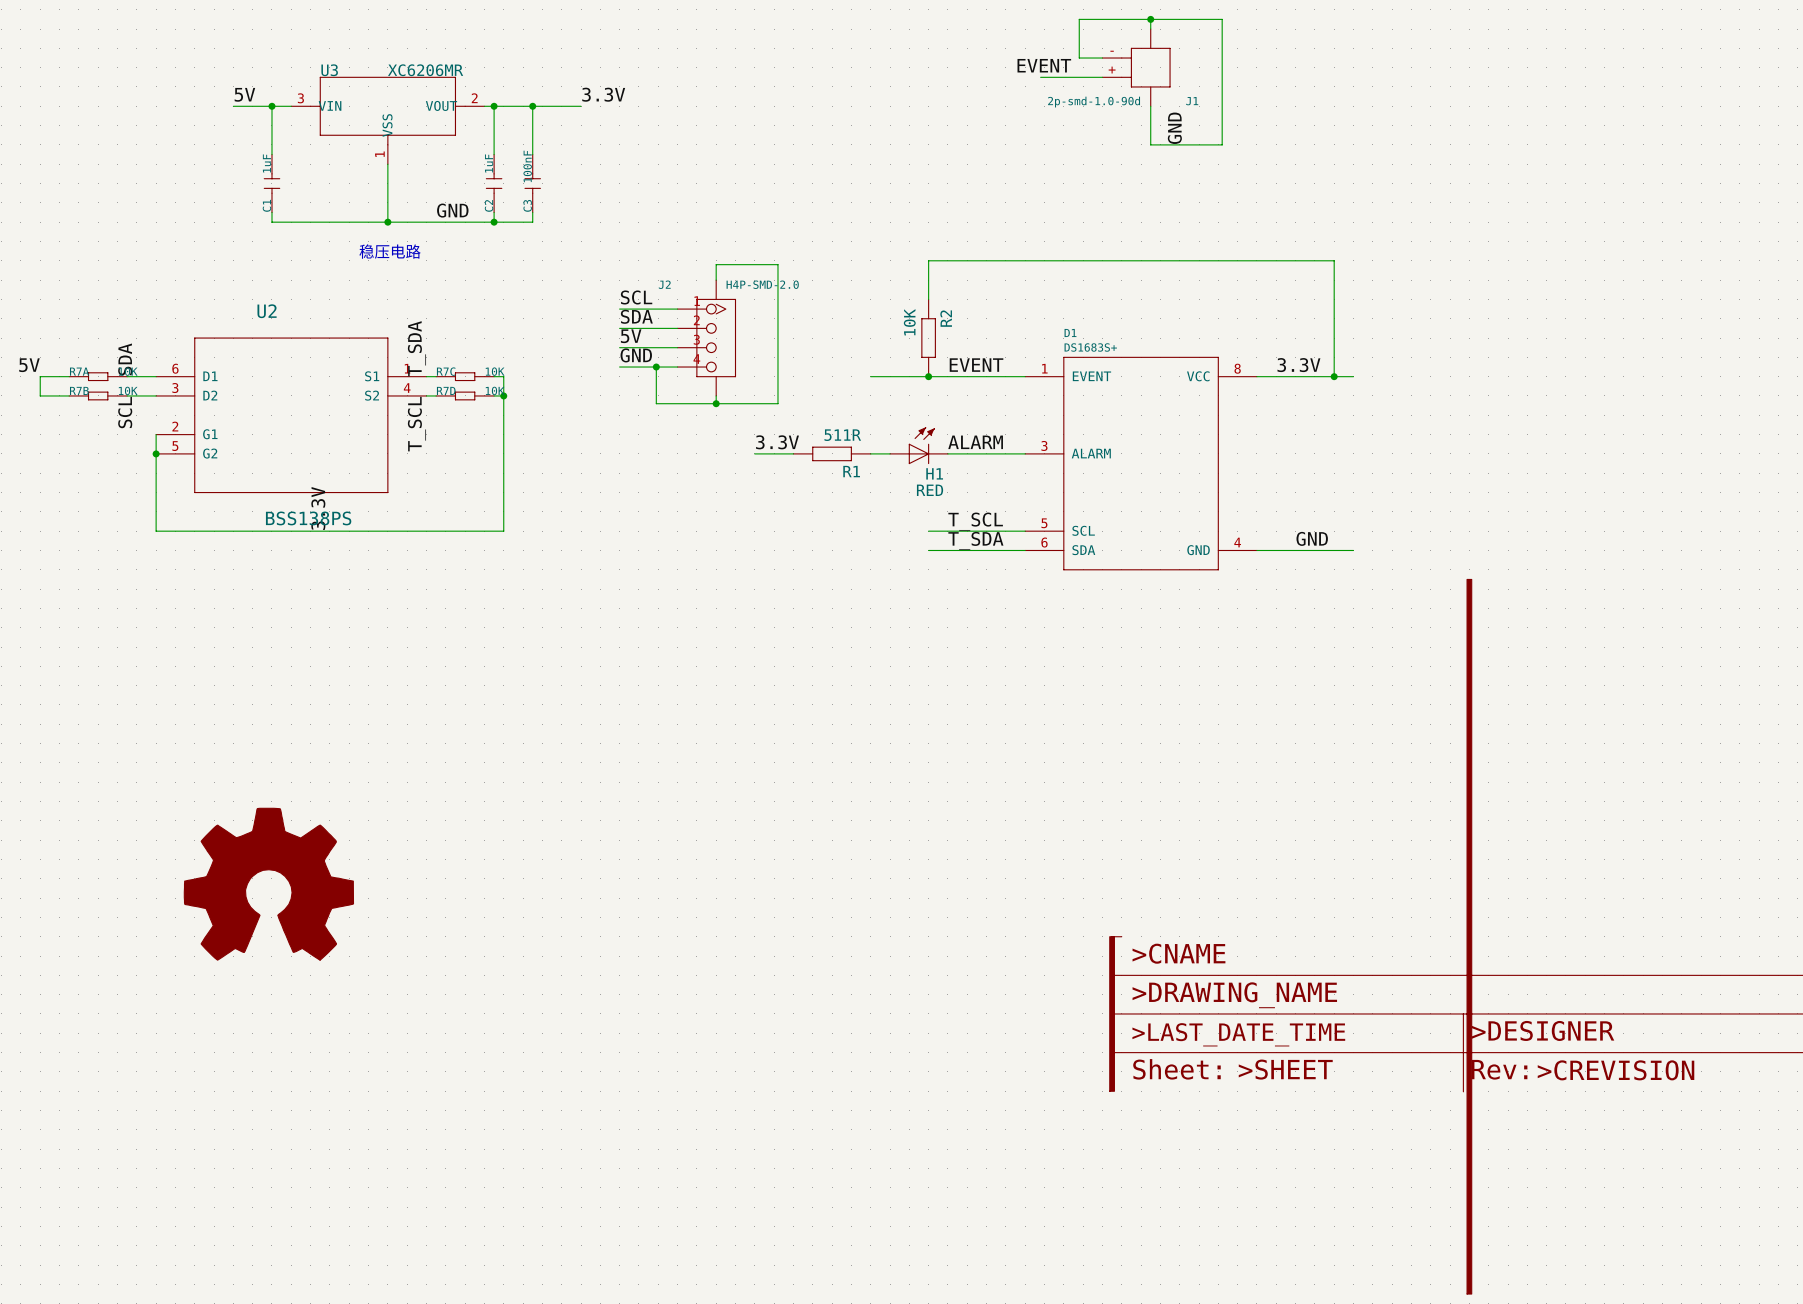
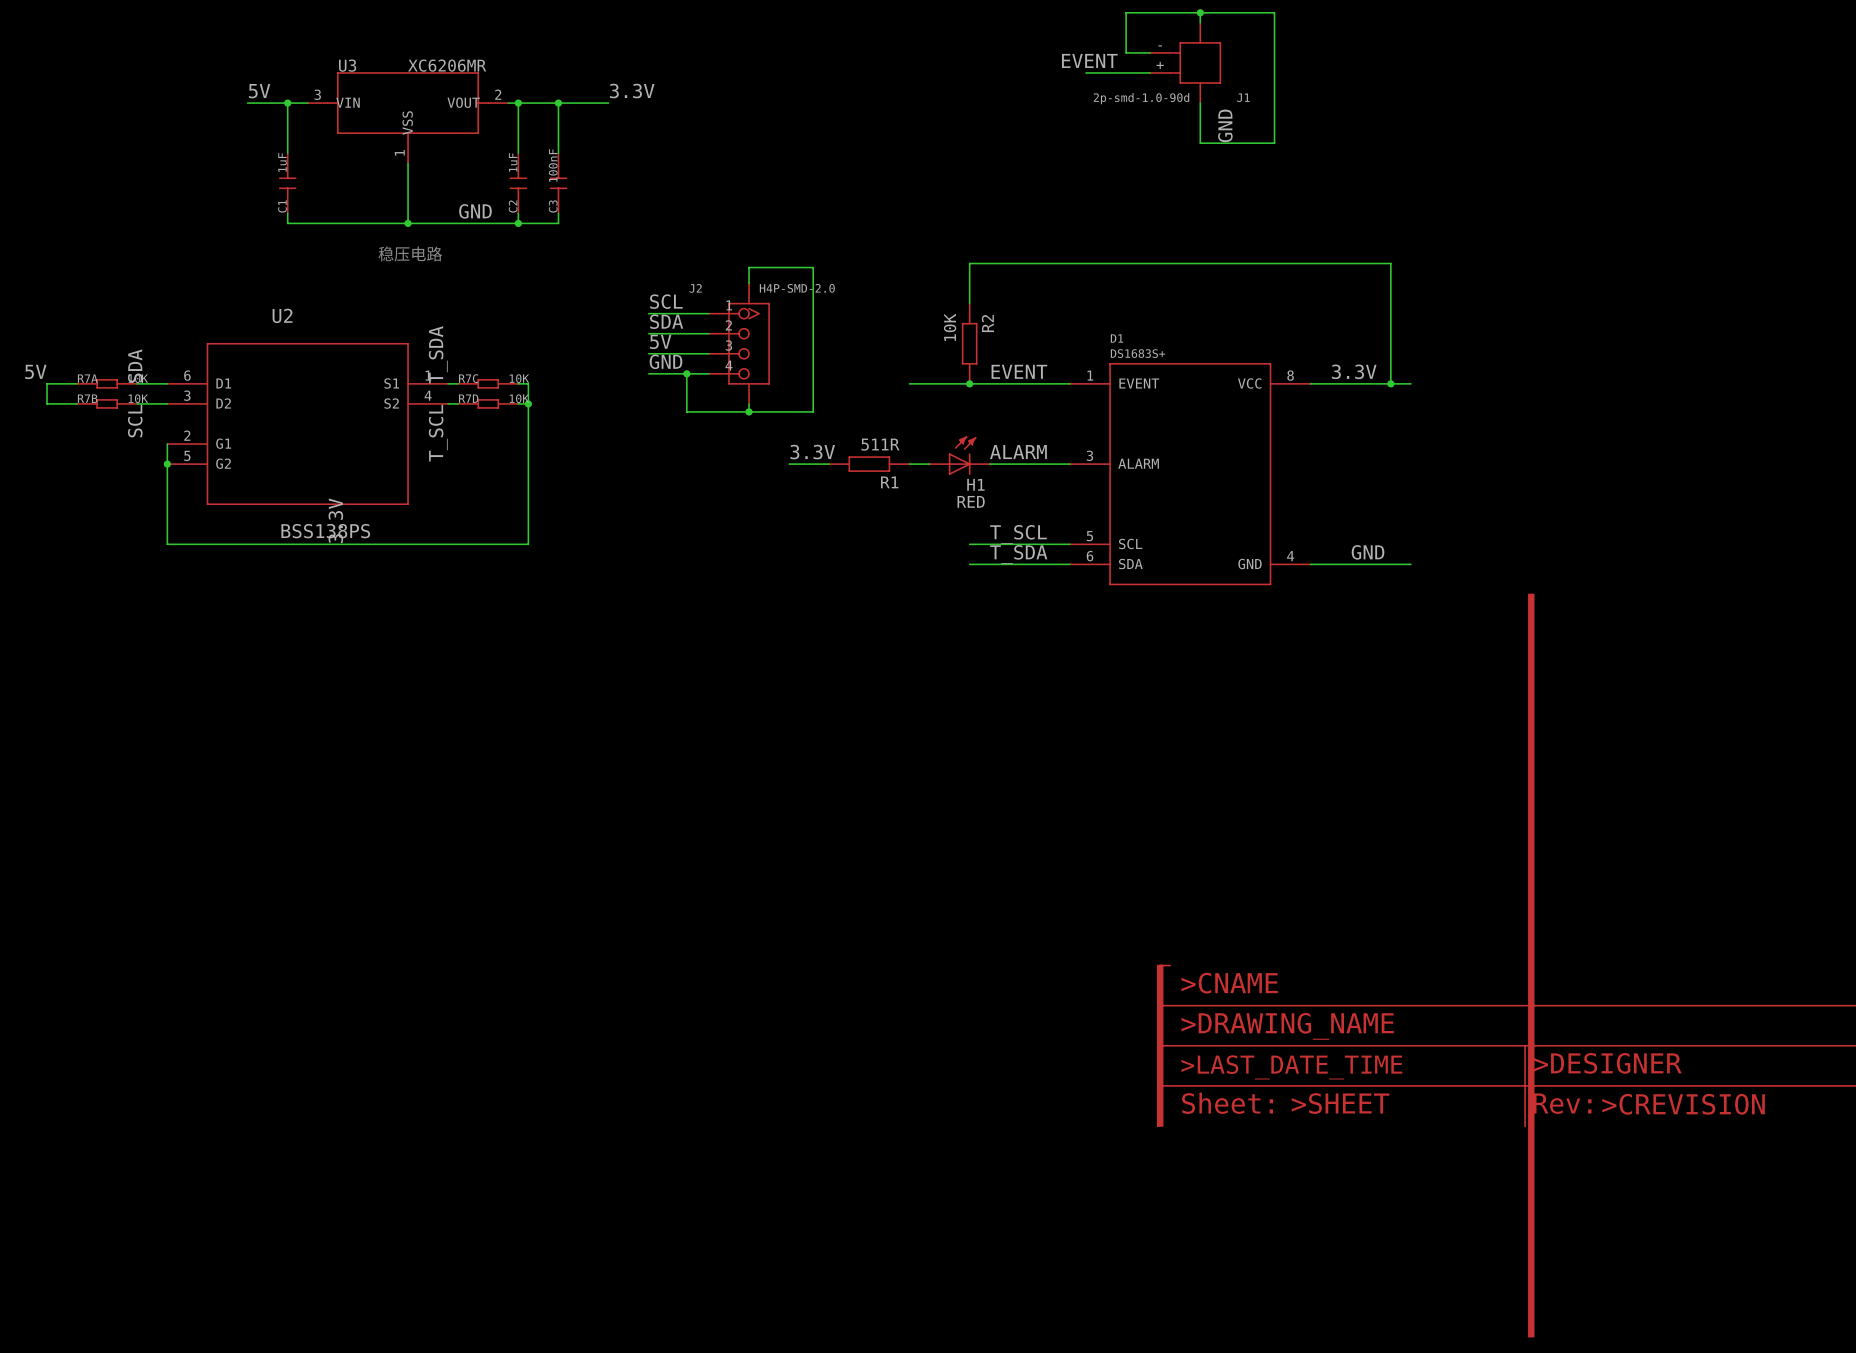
part: (268, 884) -> none

